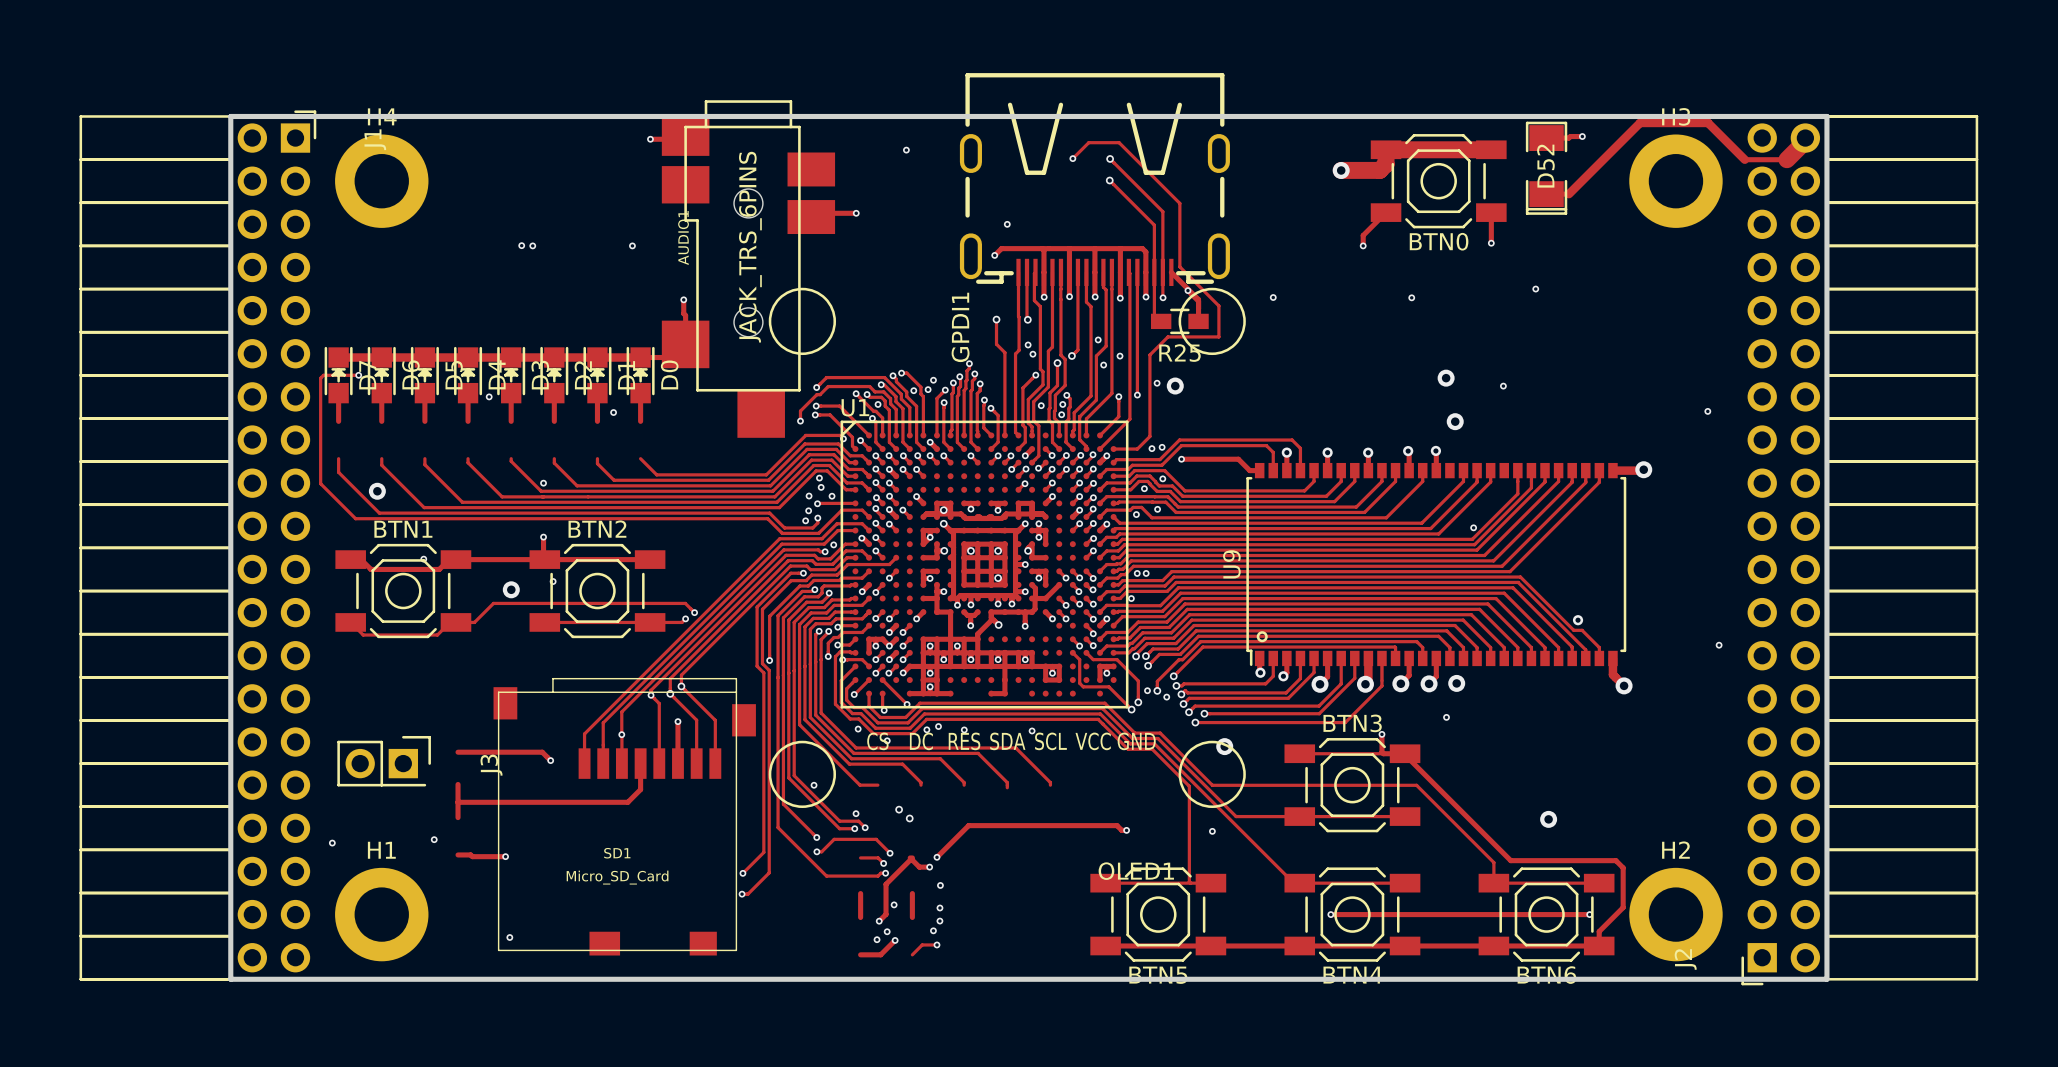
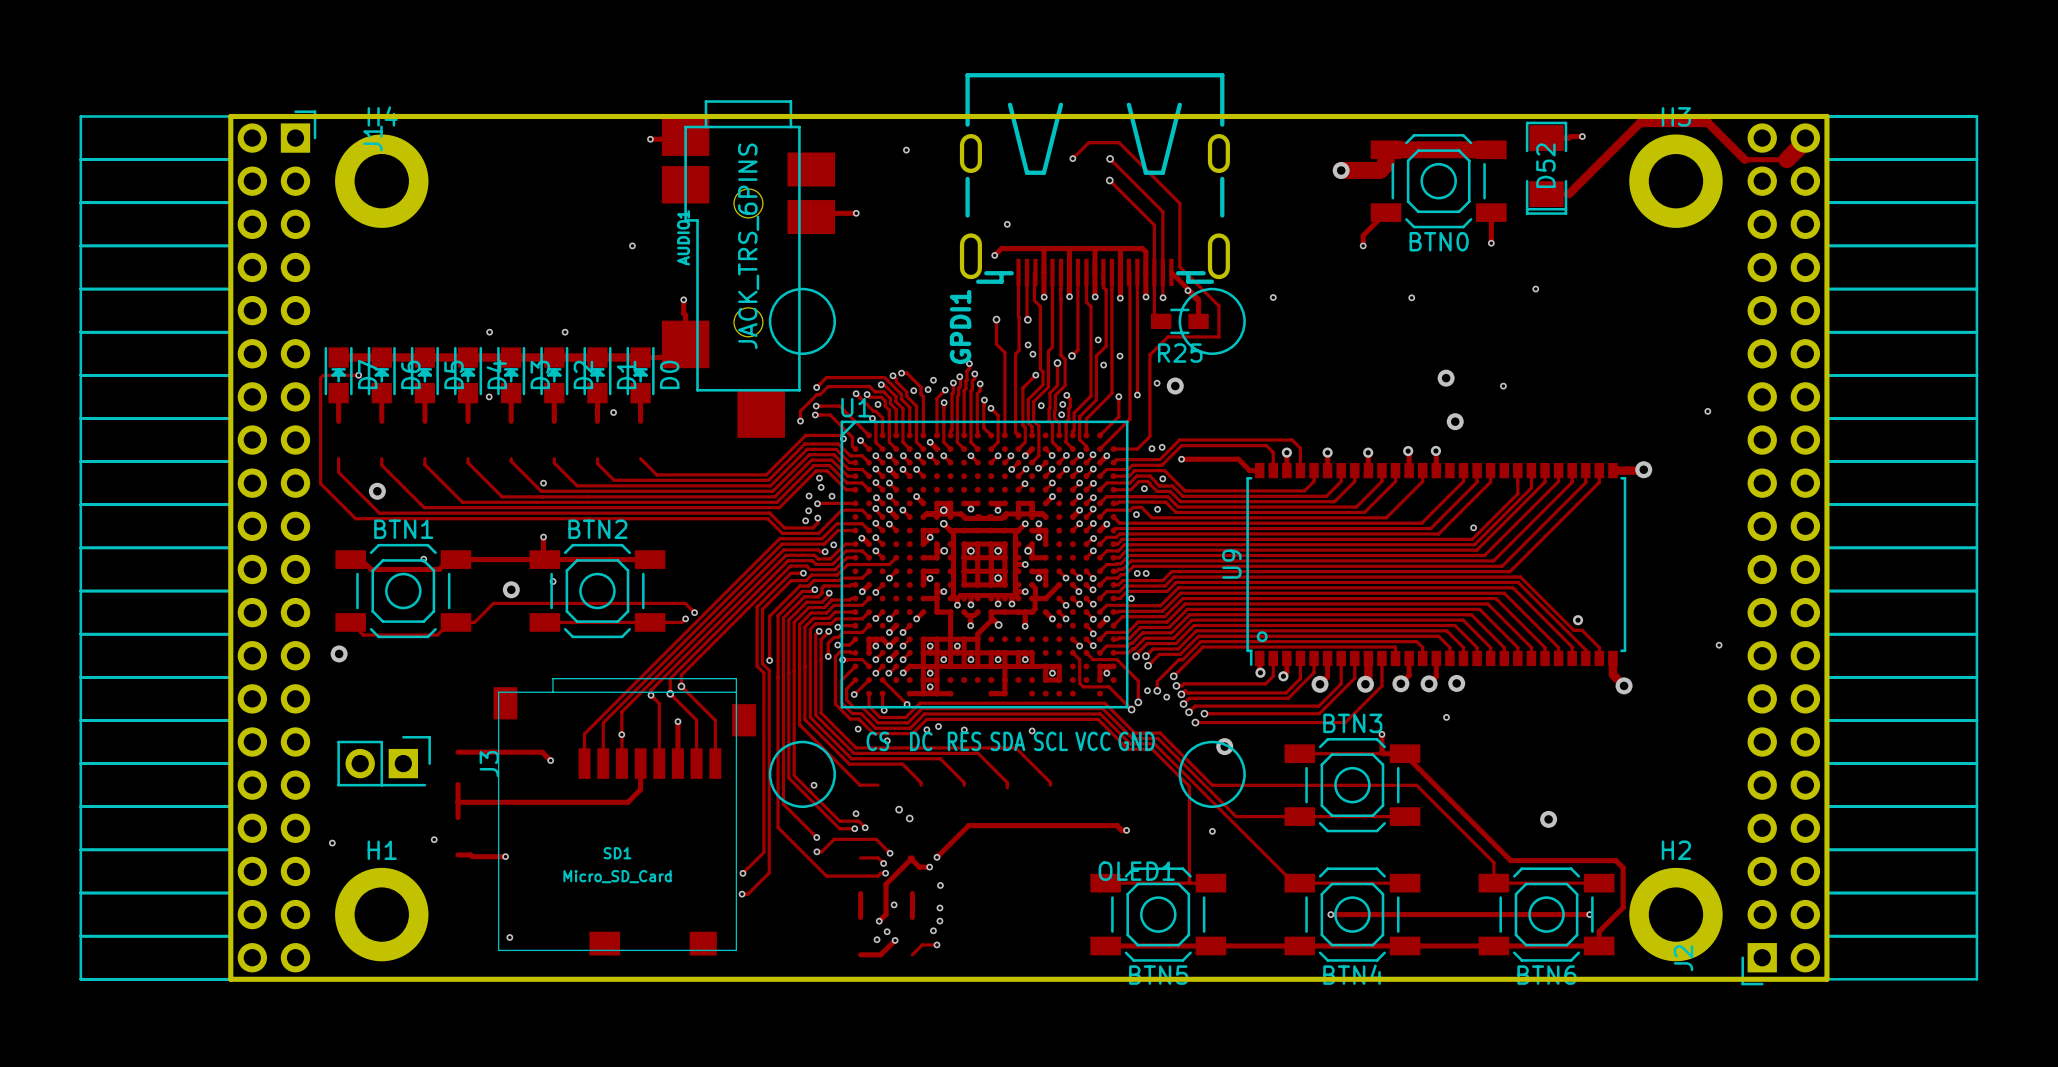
via: (521, 245) -> none
via: (532, 245) -> none
via: none -> (489, 332)
via: none -> (565, 332)
via: none -> (339, 653)

